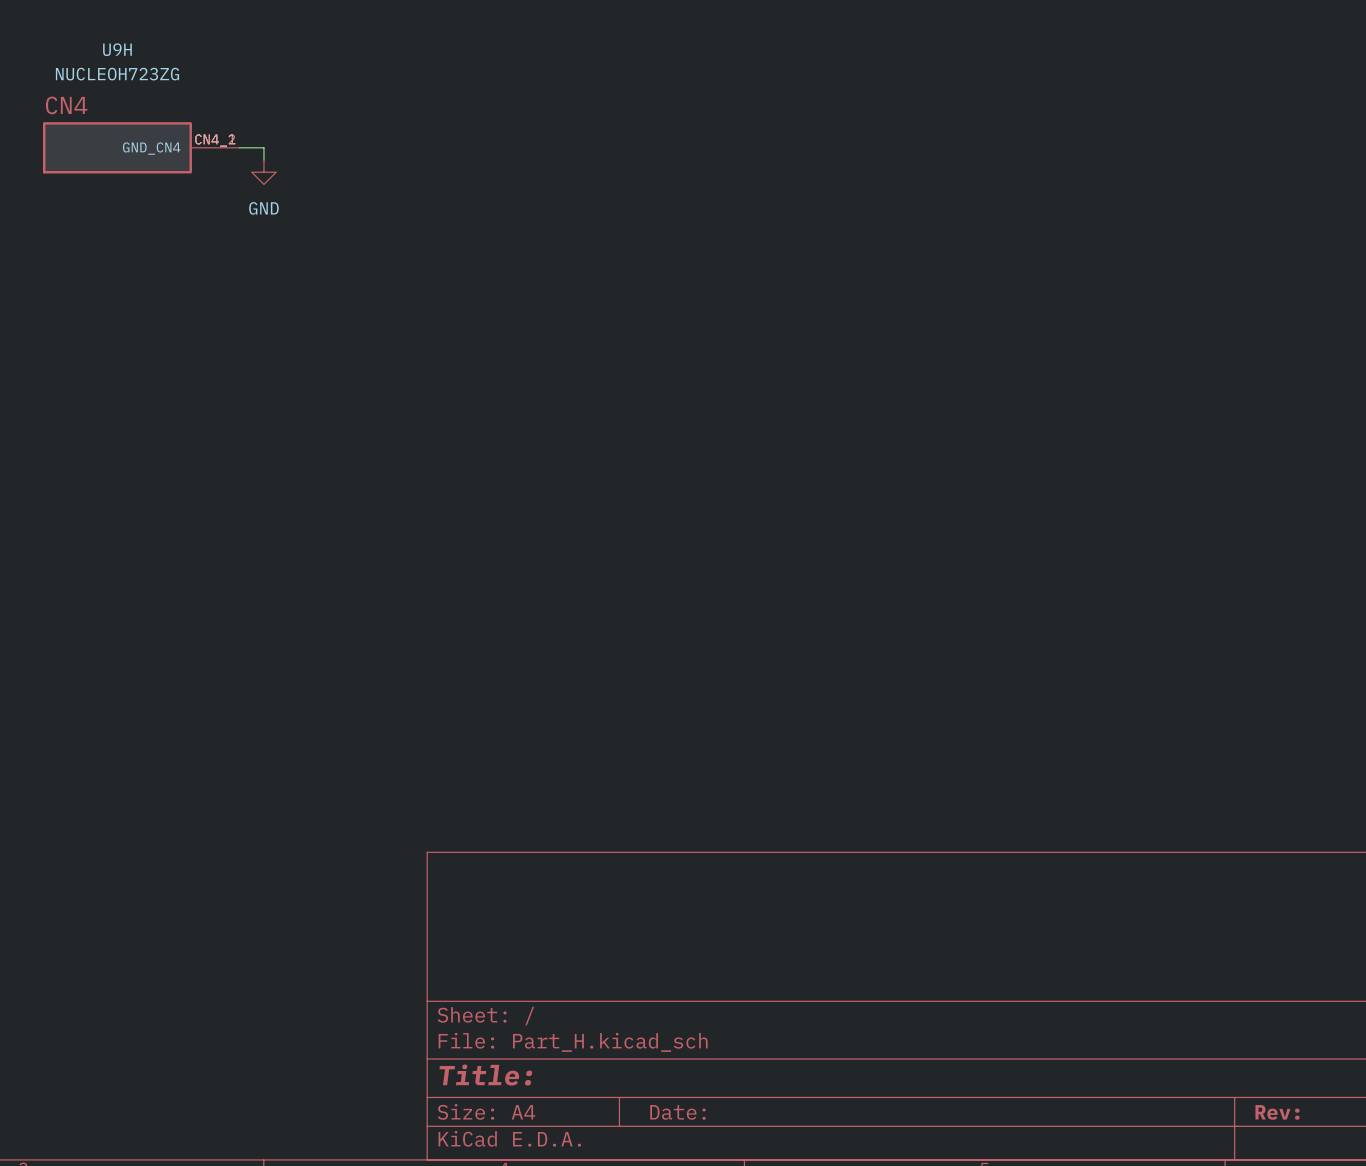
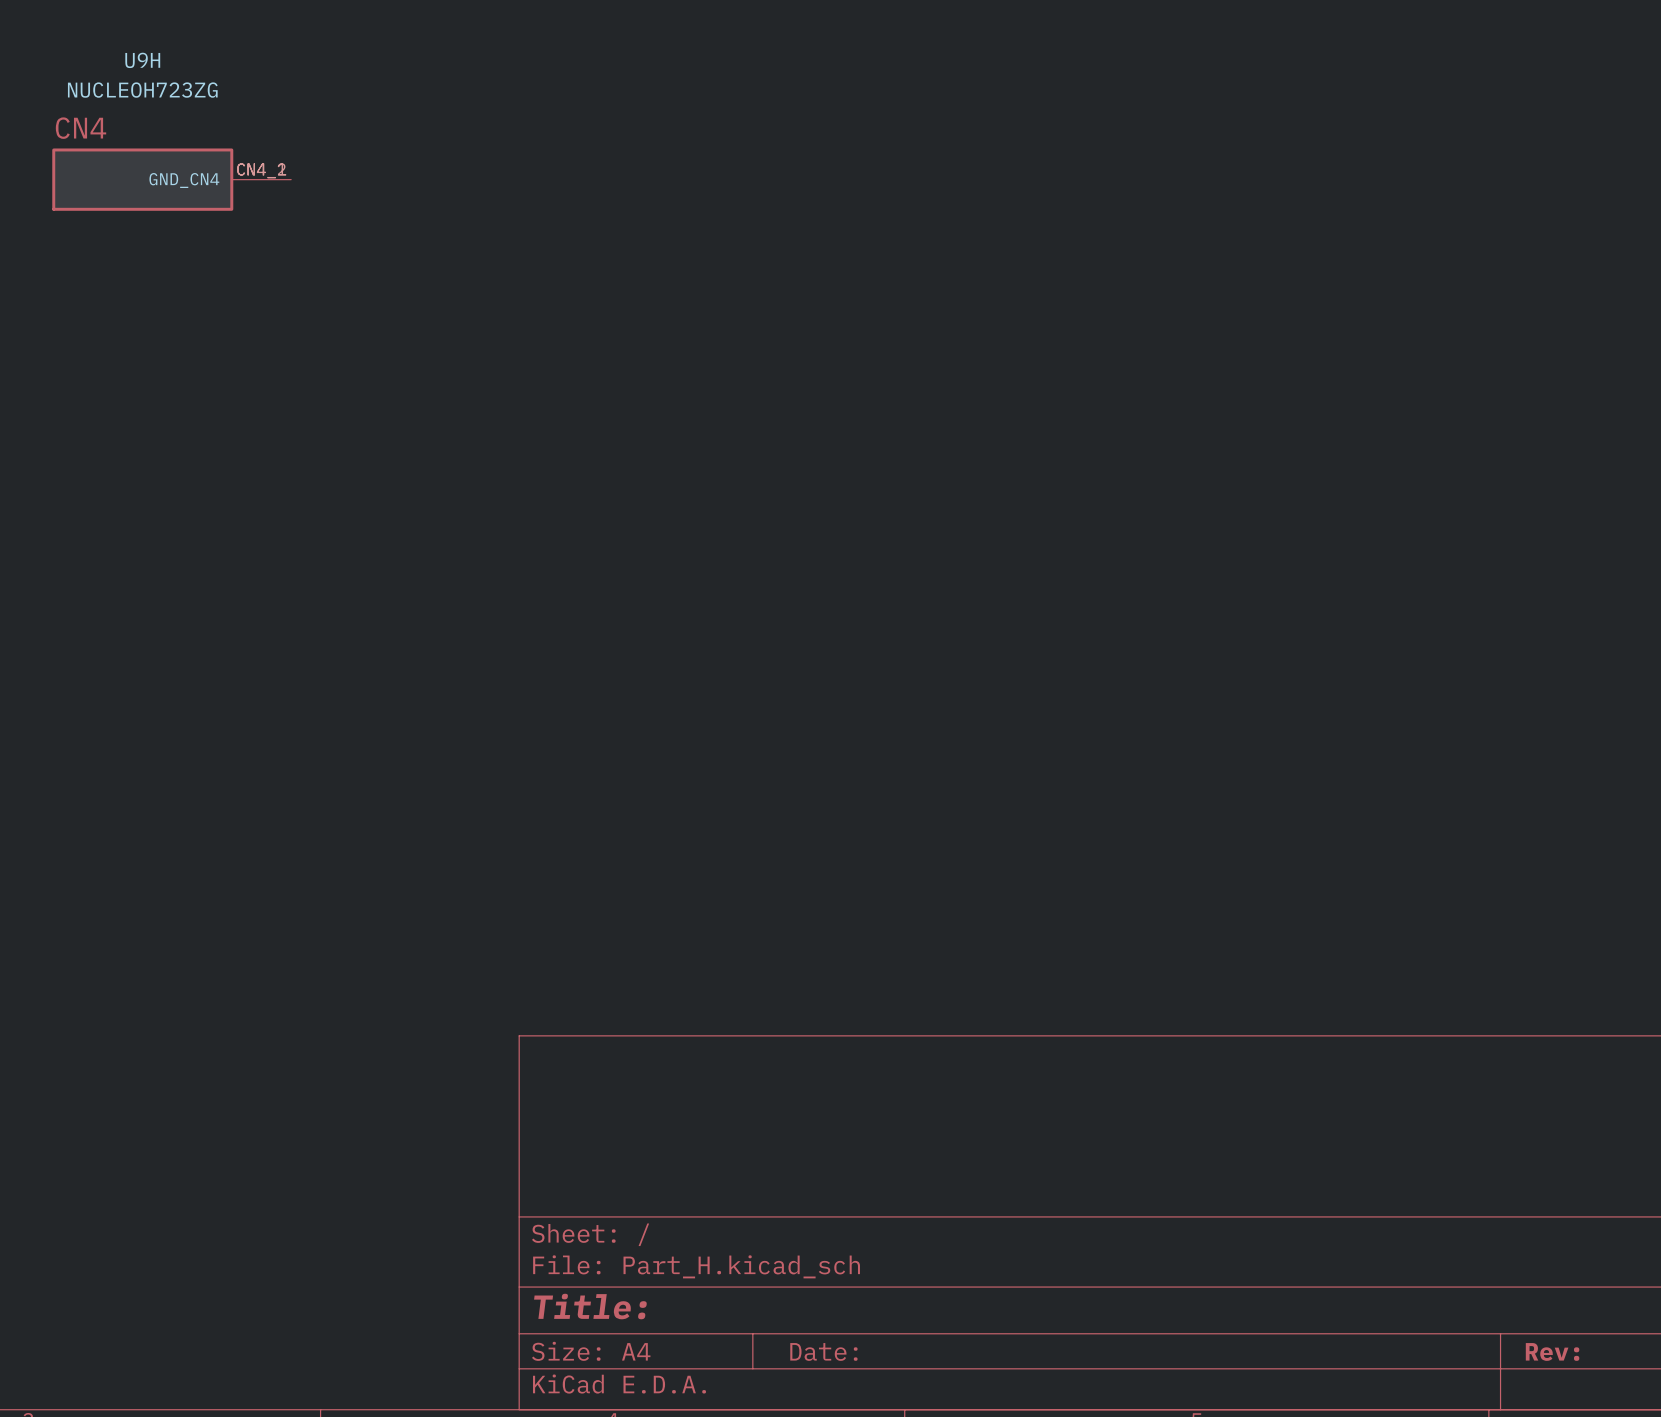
wire: (239, 147) (263, 147) (263, 160) -> none
power symbol: GND (263, 172) -> none

